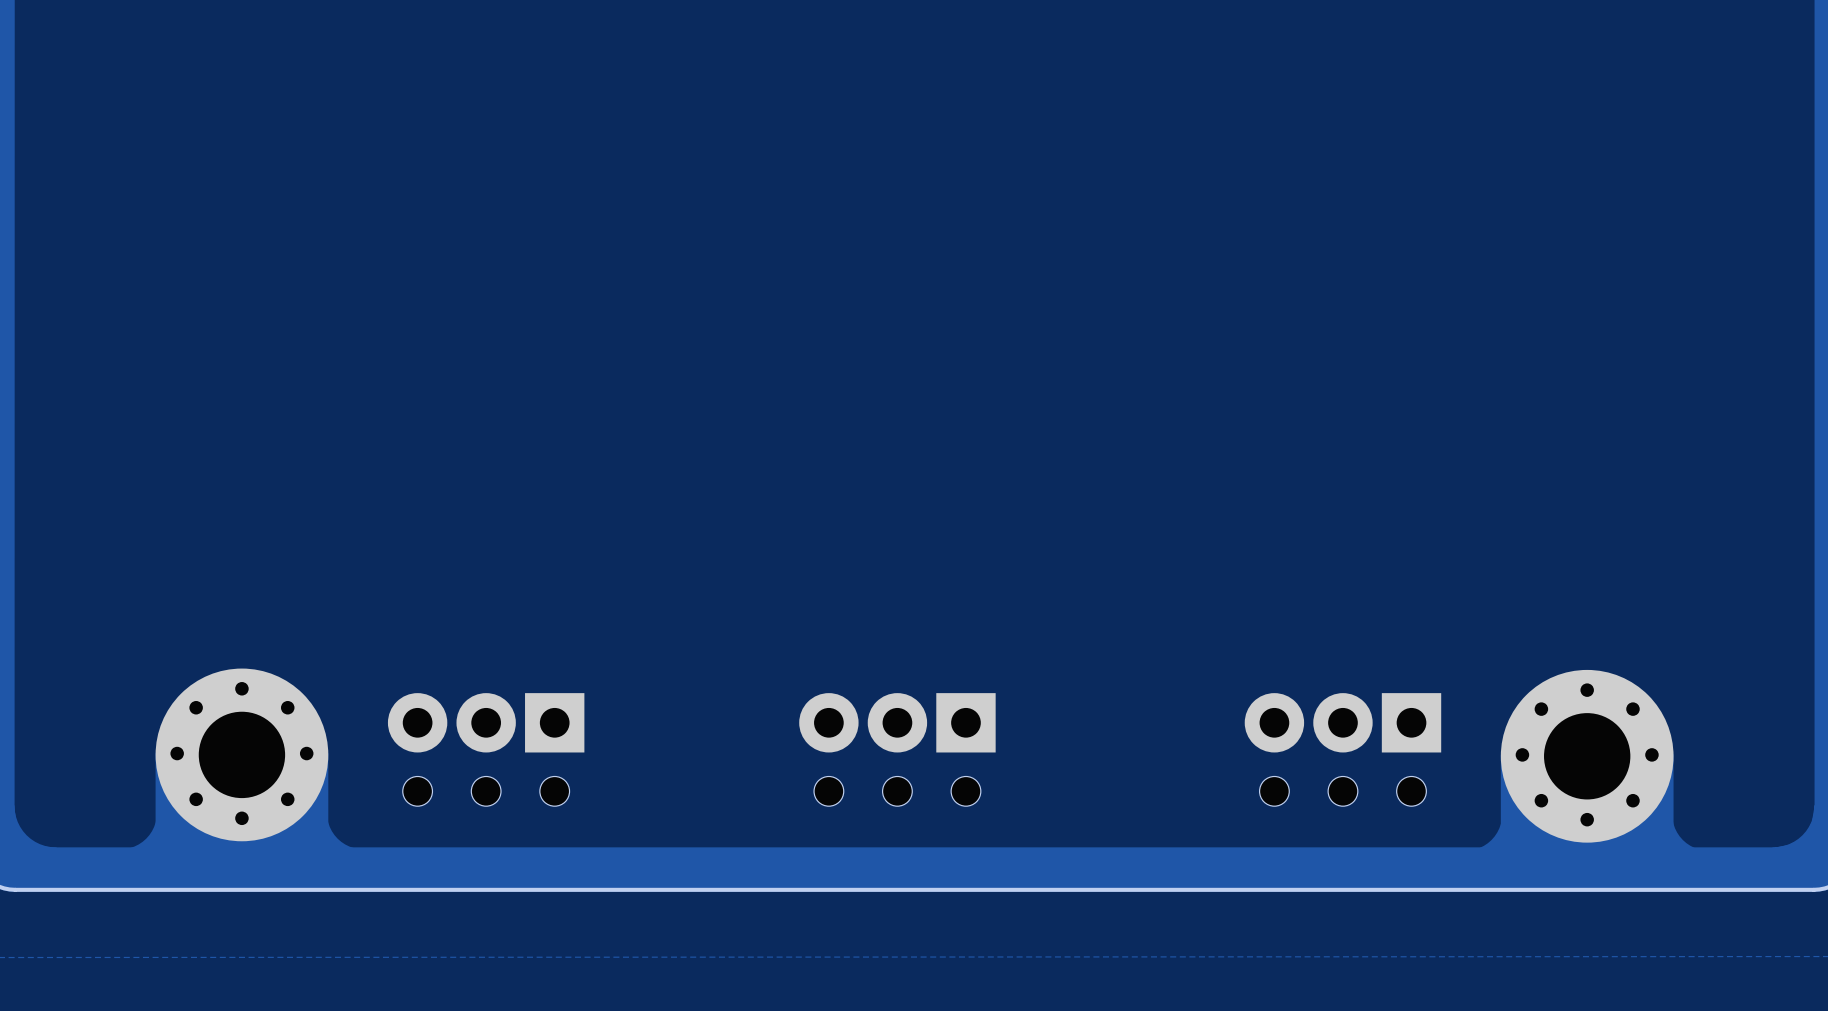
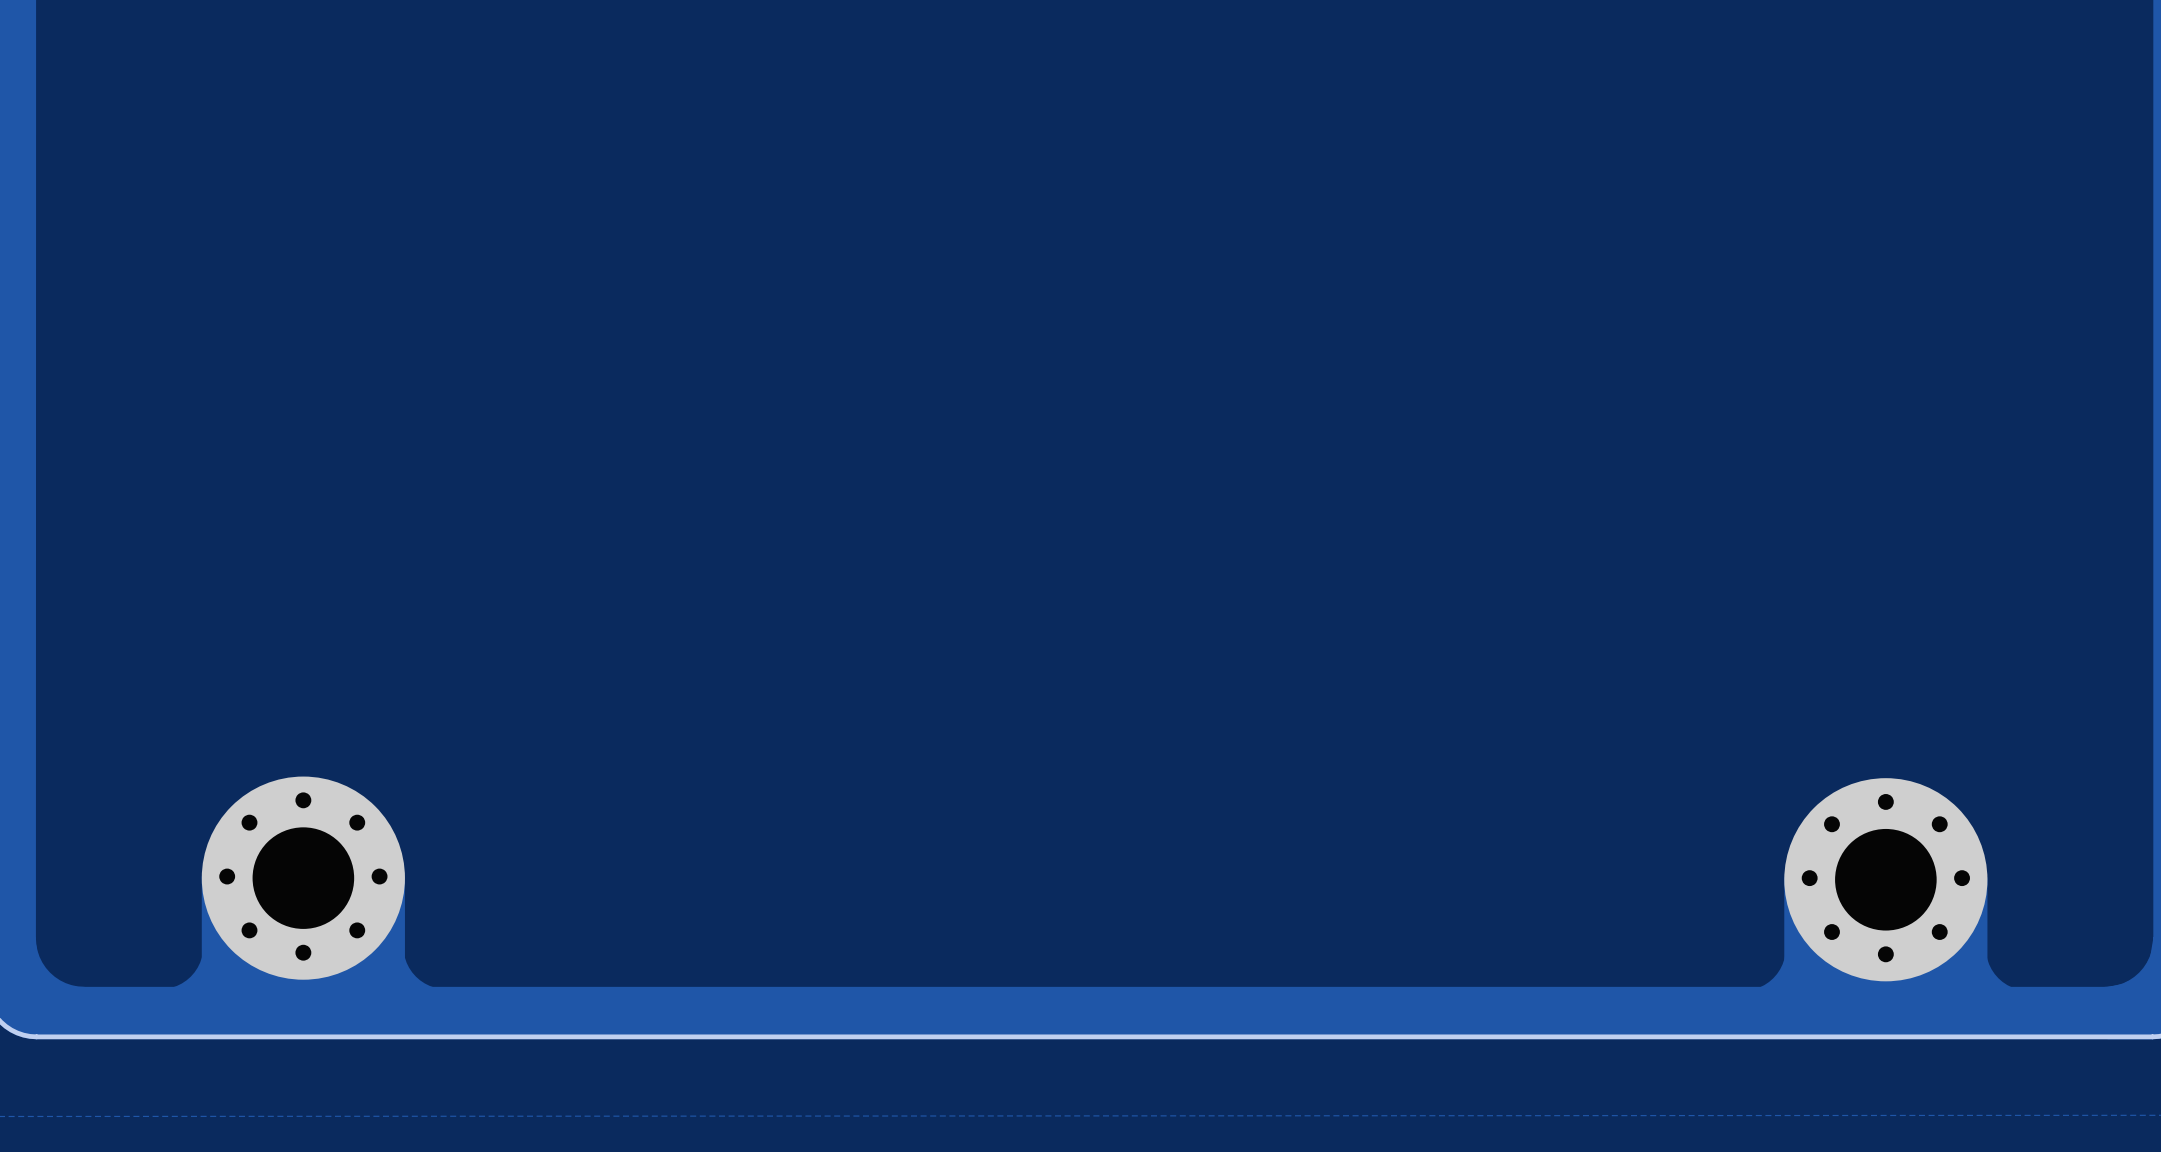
part: (486, 749) -> none
part: (897, 749) -> none
part: (1342, 749) -> none

